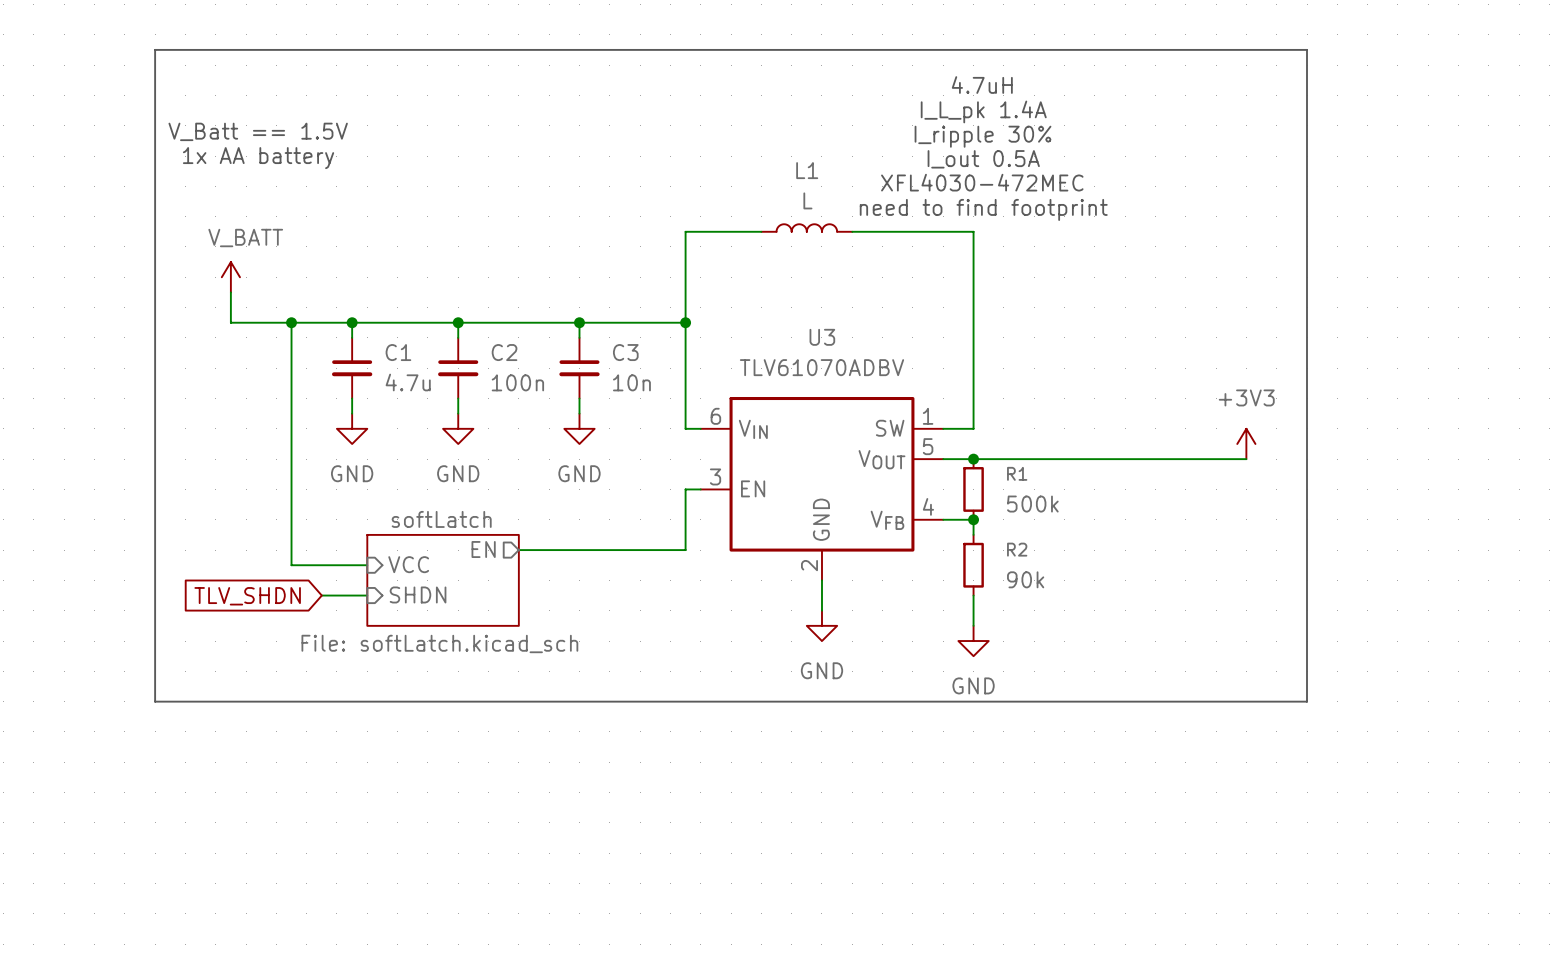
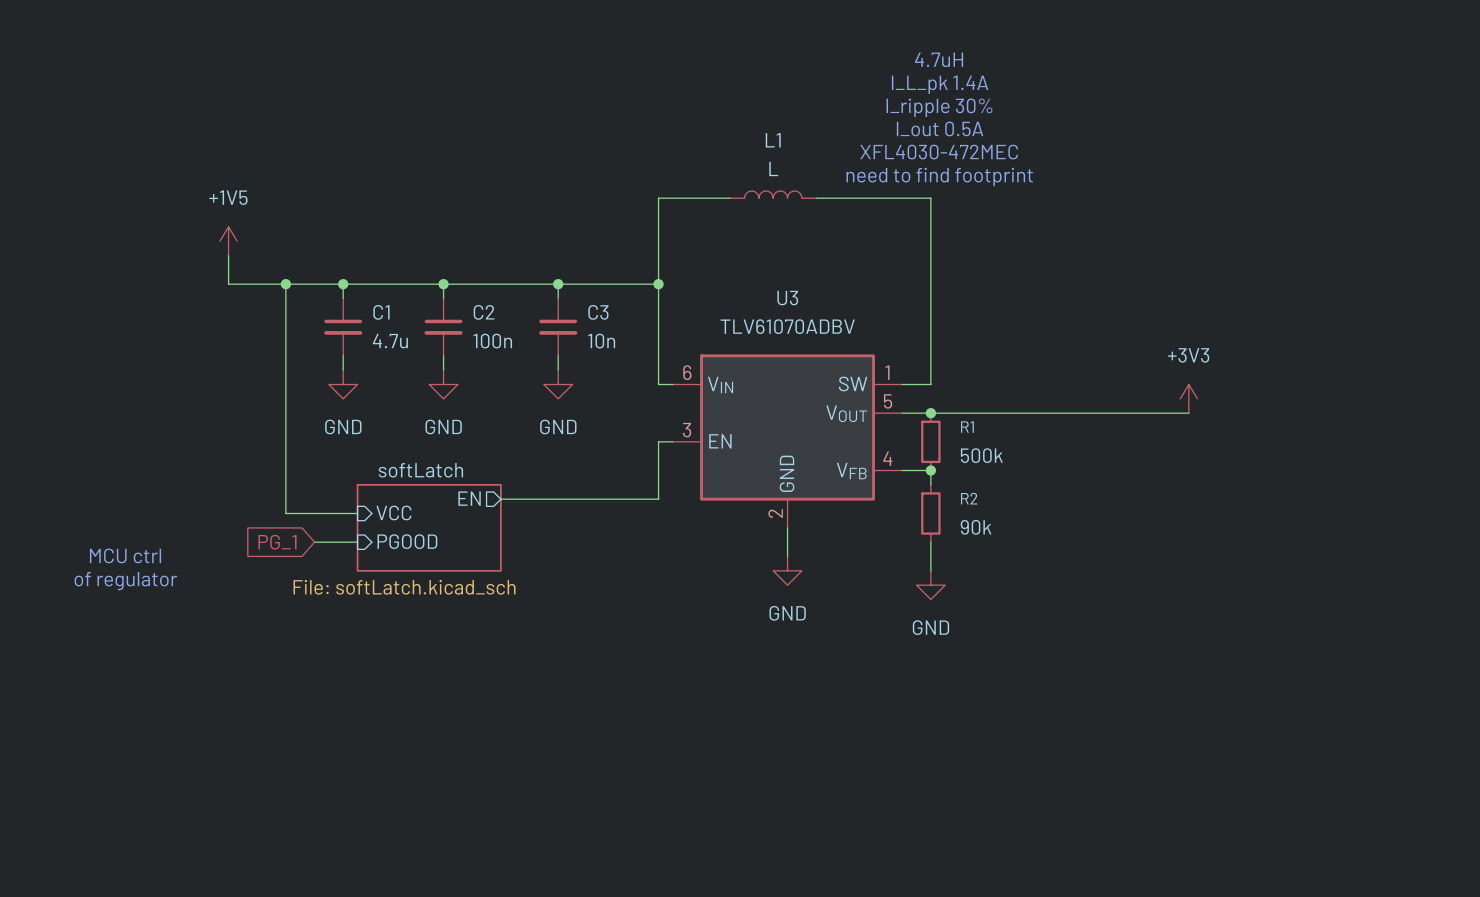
line: (155, 49) (1307, 49) (1307, 701) (155, 701) (155, 49) -> none
text: V_Batt == 1.5V (258, 131) -> none
text: 1x AA battery (258, 158) -> none
power symbol: V_BATT (230, 277) -> +1V5 (228, 241)
sheet pin: SHDN (418, 594) -> PGOOD (407, 541)
global label: TLV_SHDN (247, 596) -> PG_1 (277, 542)
text: none -> MCU ctrl (125, 555)
text: none -> of regulator (125, 581)

